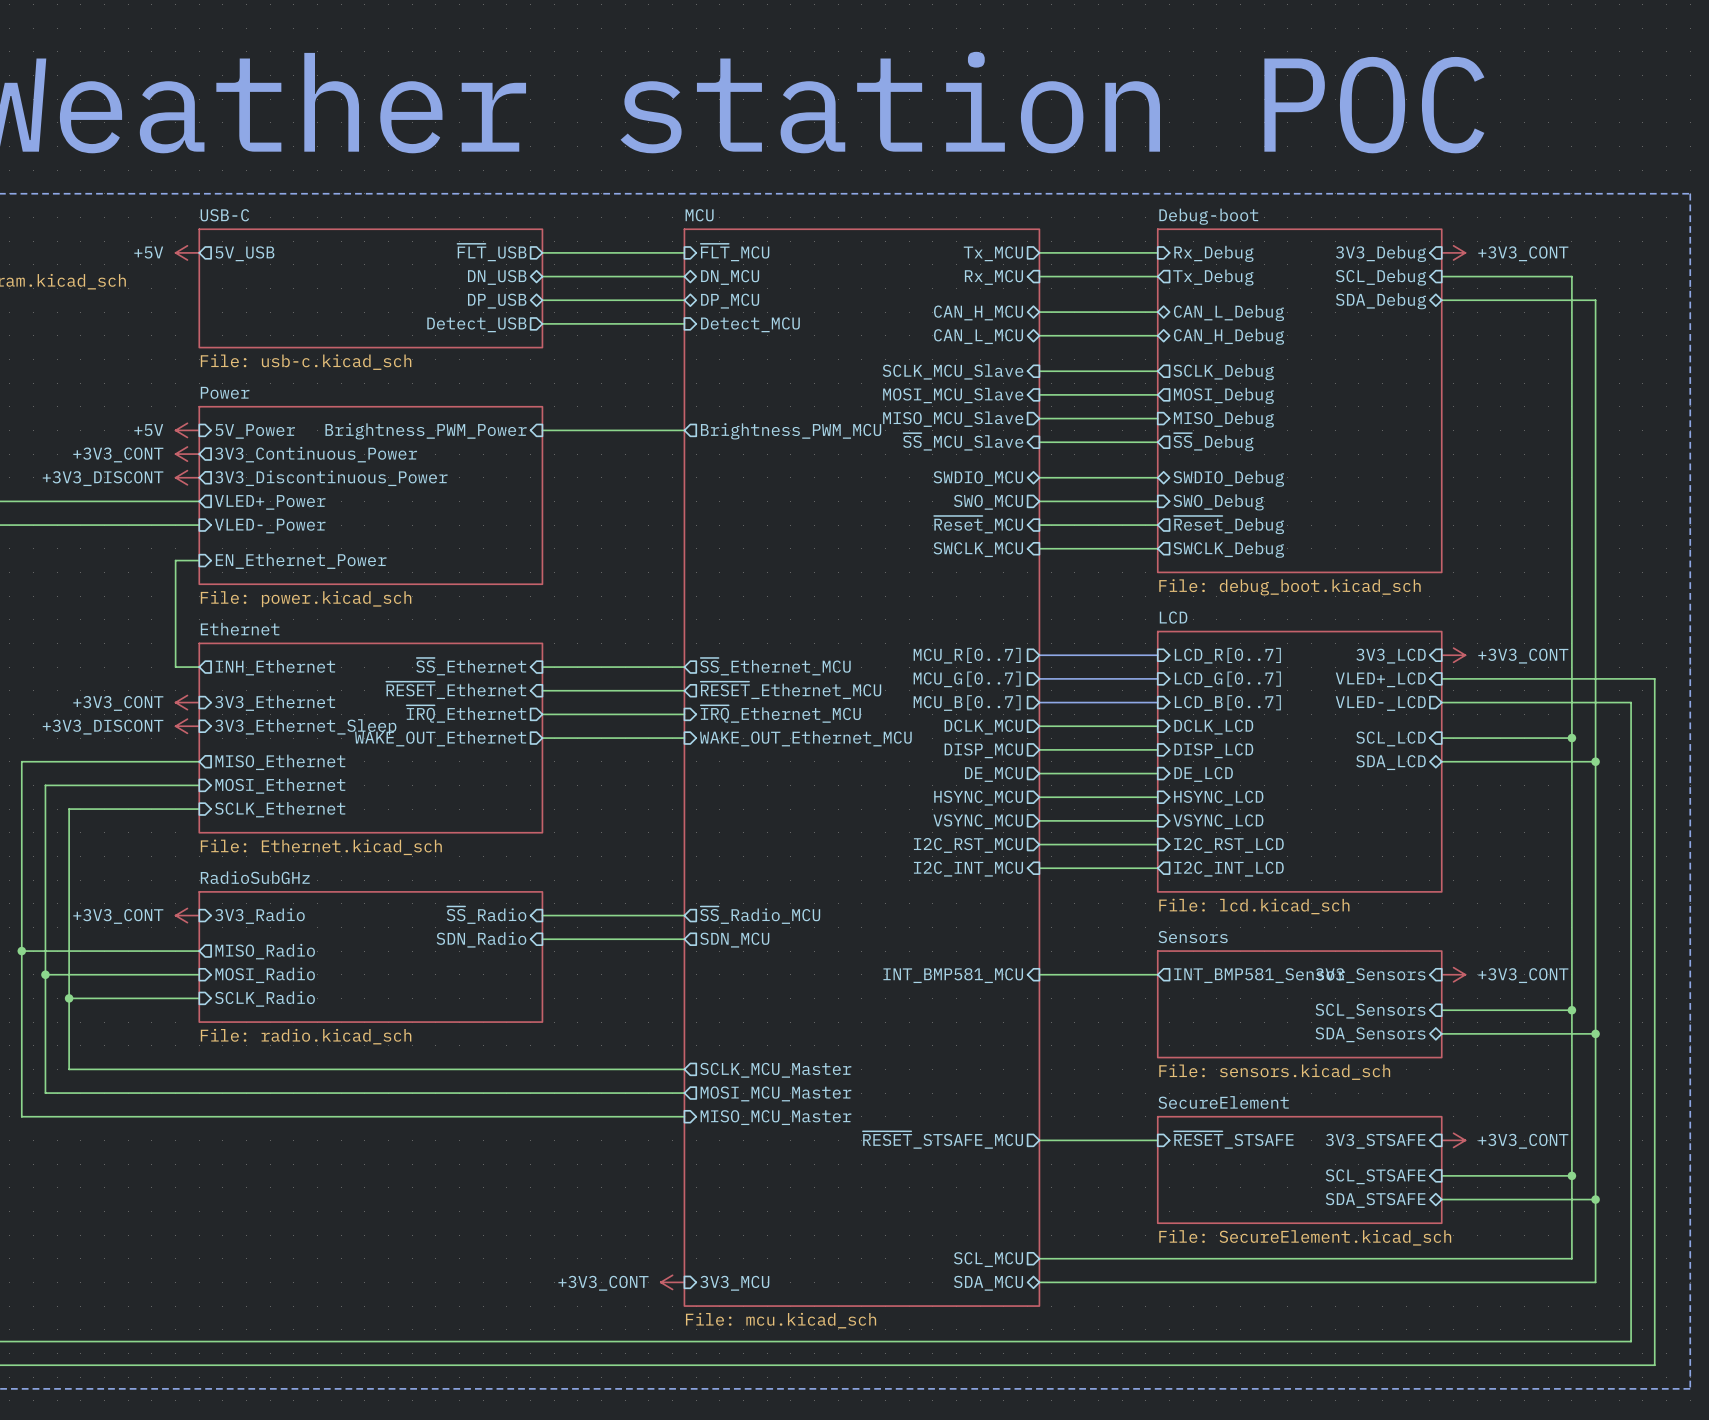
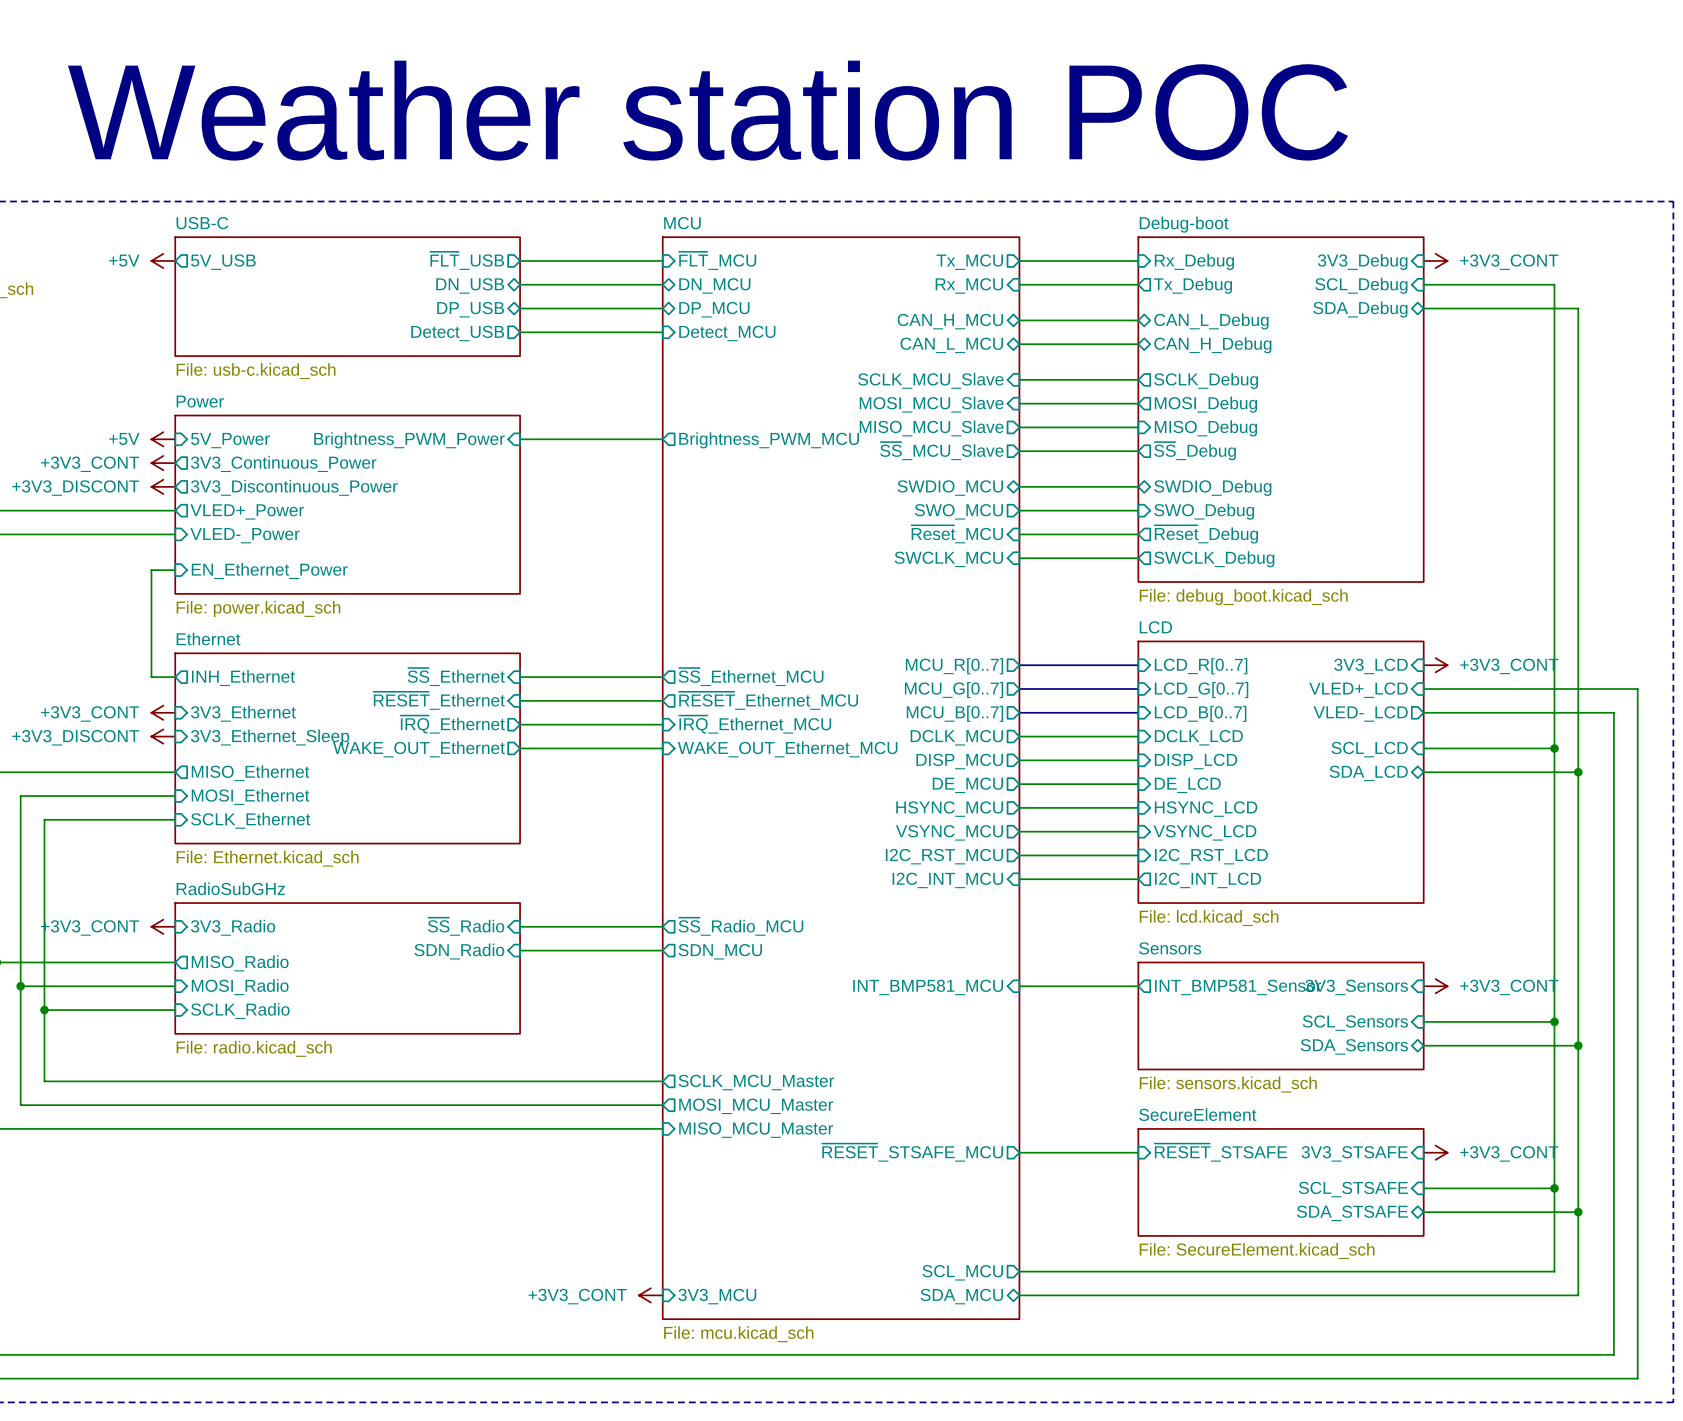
sheet pin shape: input (963, 441) -> output (941, 451)

